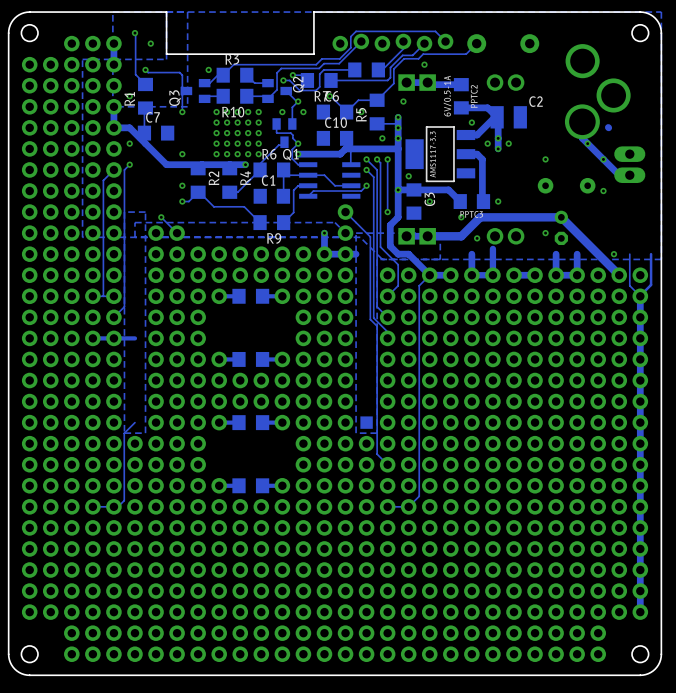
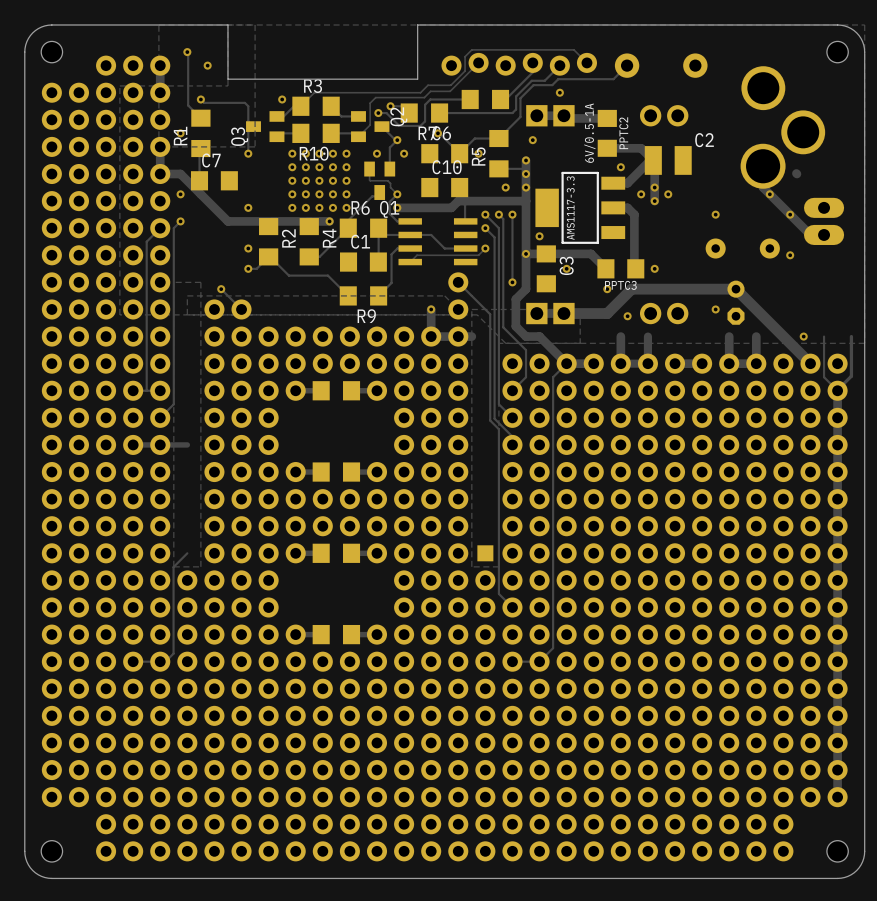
track: (492, 248) (492, 254) -> none

